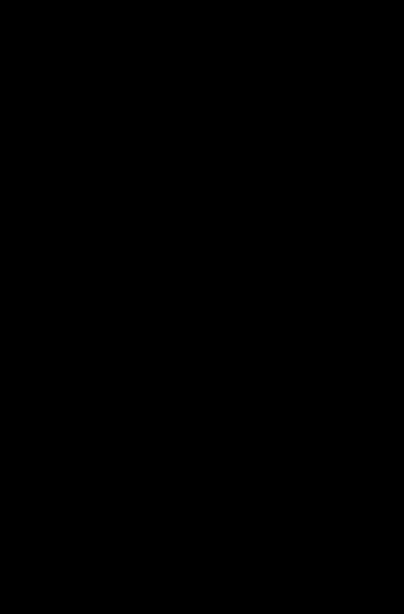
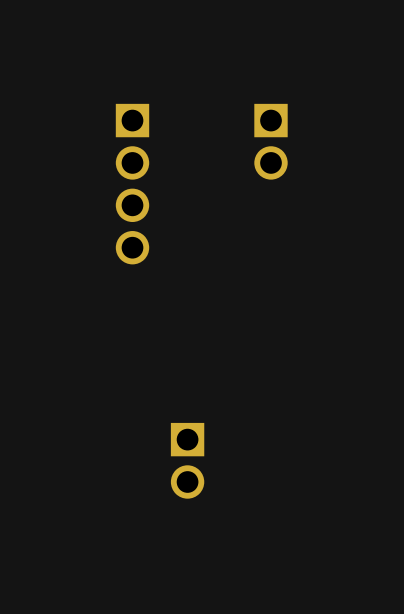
part: none -> (271, 141)
part: none -> (132, 184)
part: none -> (187, 460)

